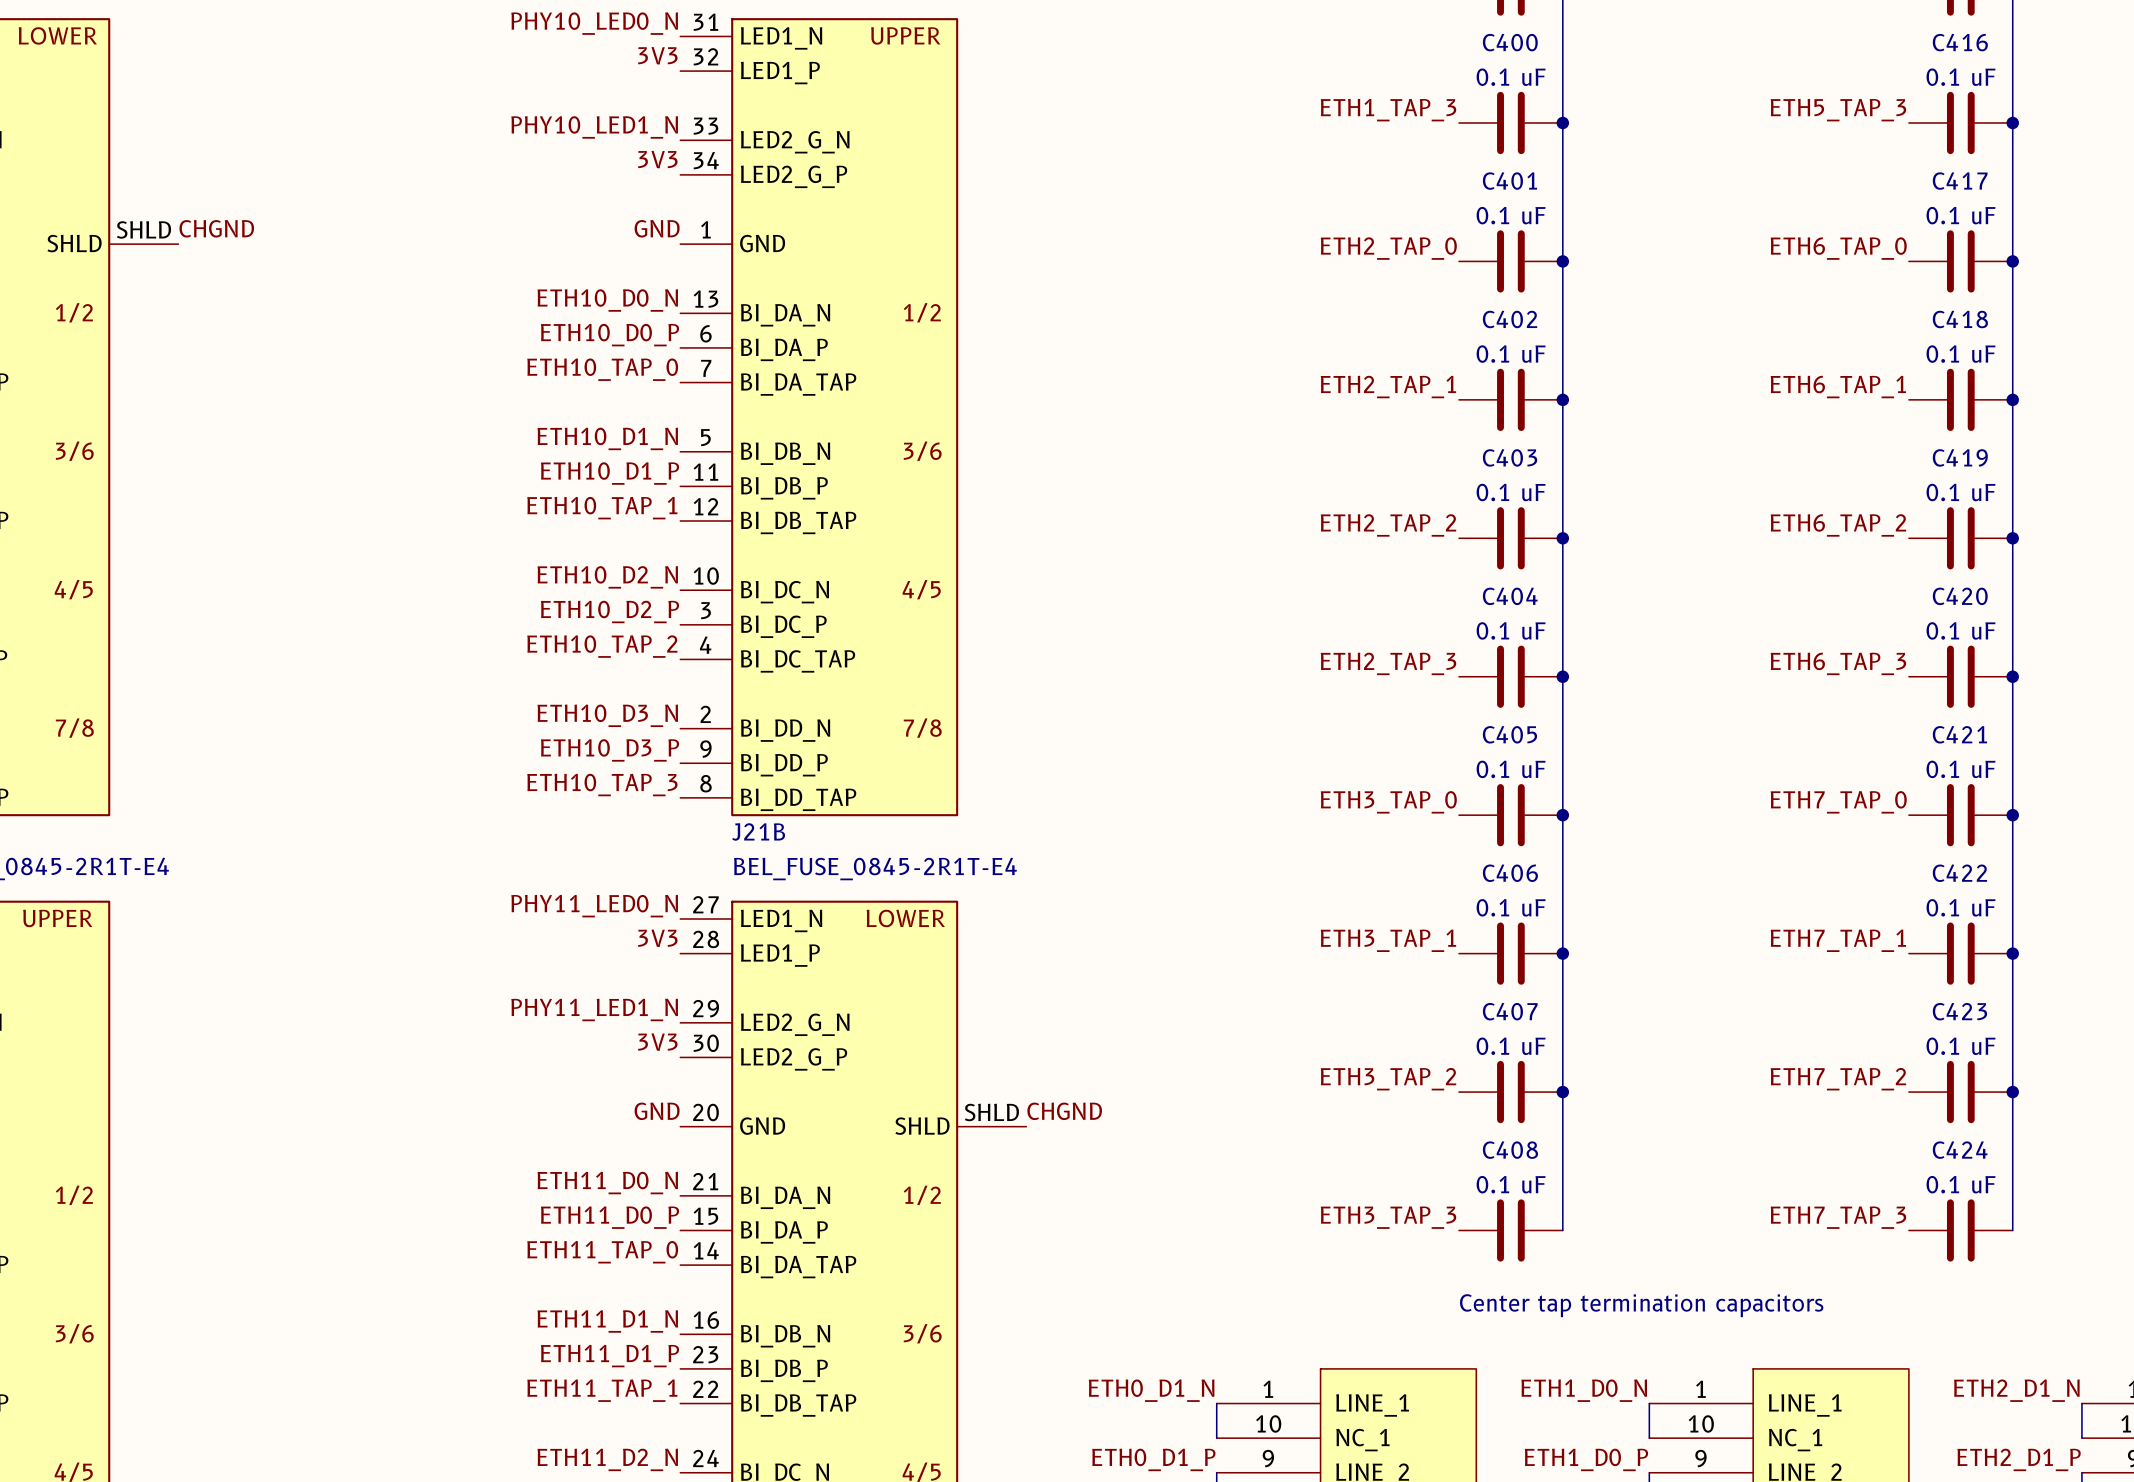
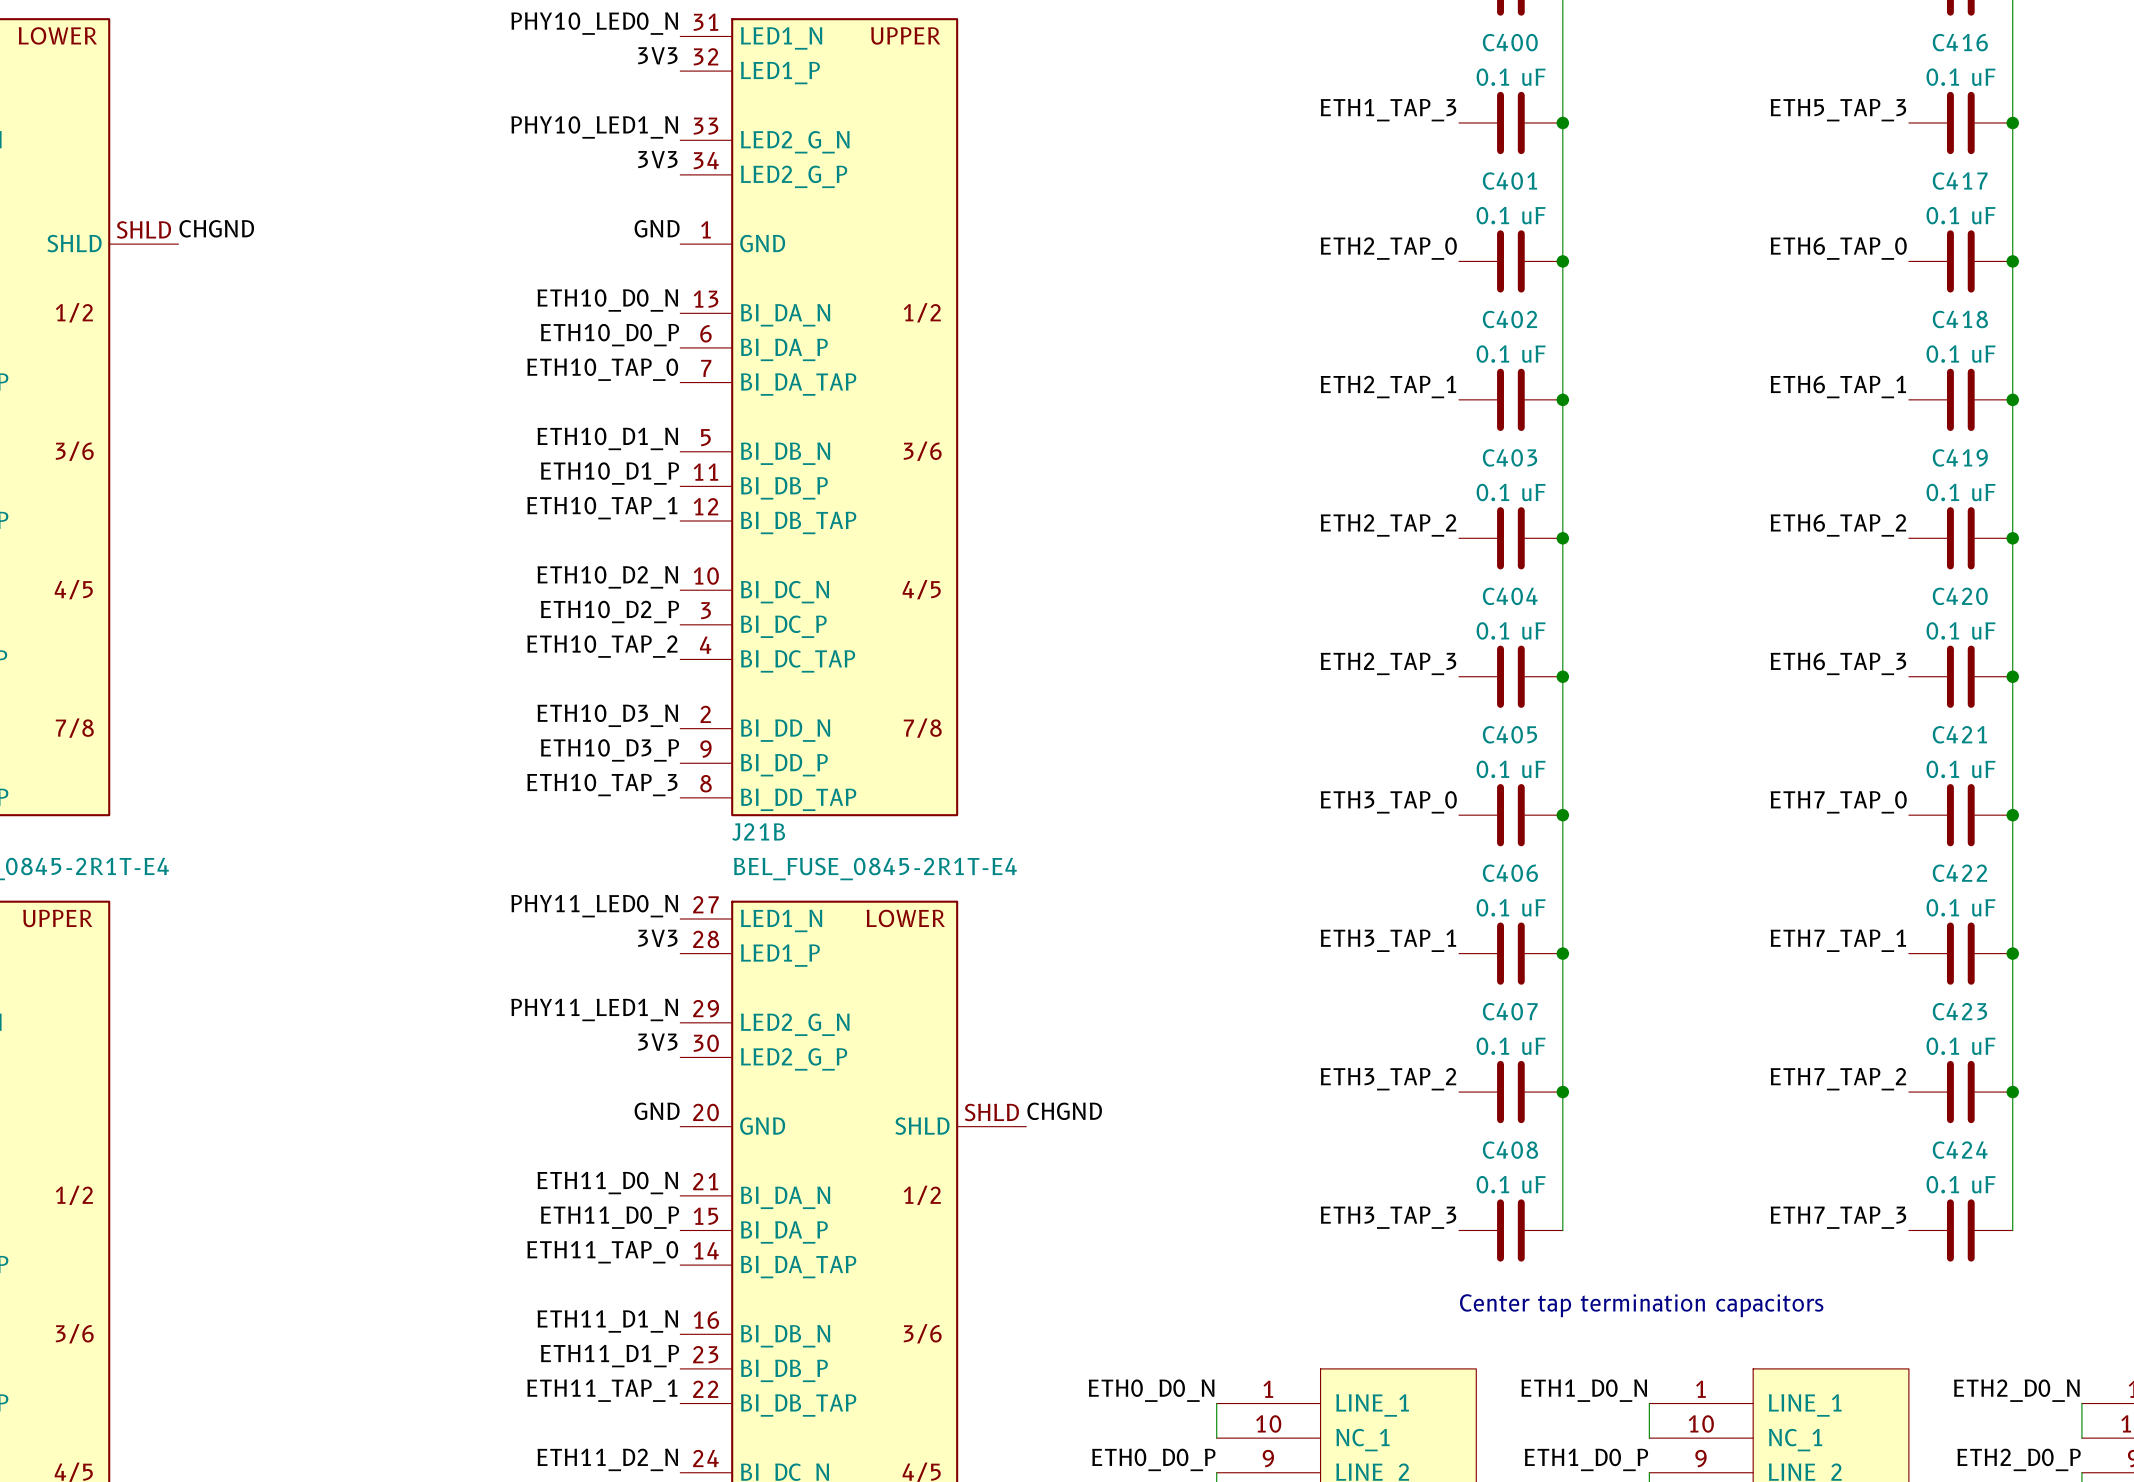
label: ETH0_D1_N (1151, 1390) -> ETH0_D0_N (1151, 1390)
label: ETH2_D1_N (2016, 1390) -> ETH2_D0_N (2016, 1390)
label: ETH0_D1_P (1153, 1459) -> ETH0_D0_P (1153, 1459)
label: ETH2_D1_P (2019, 1459) -> ETH2_D0_P (2019, 1459)

